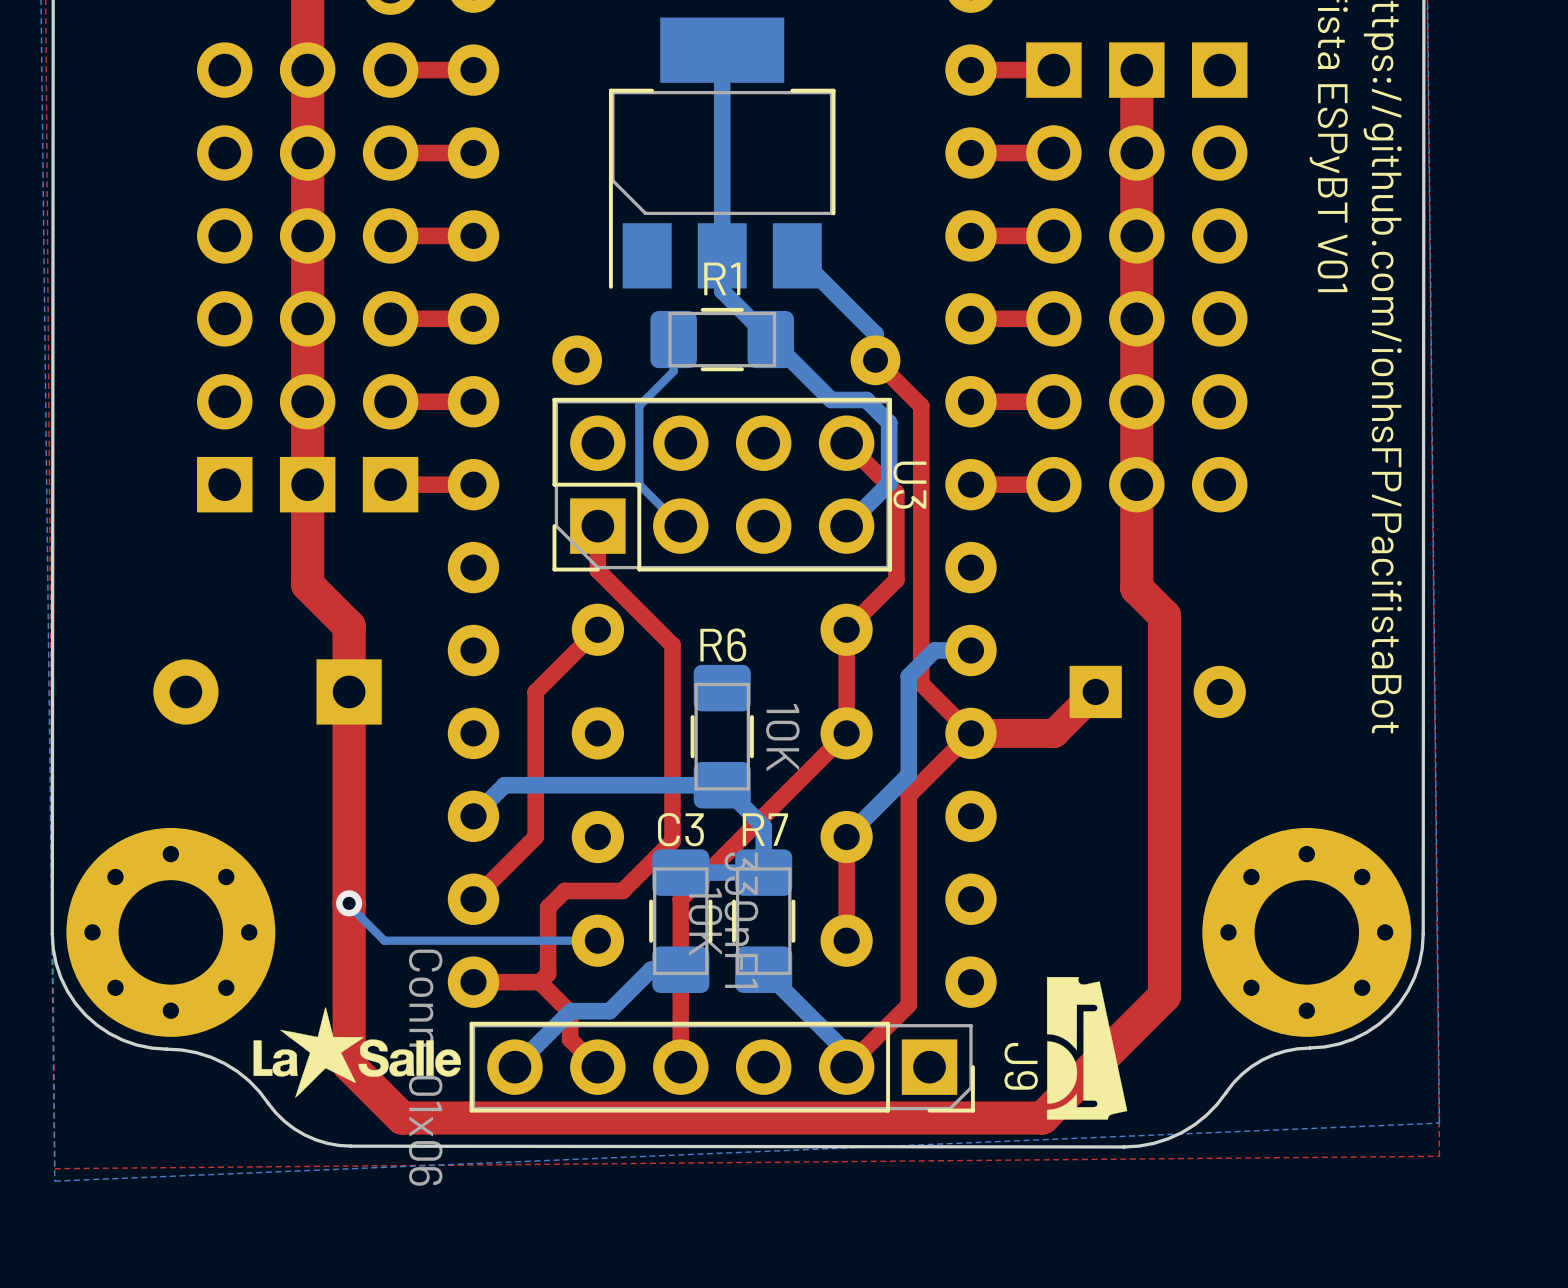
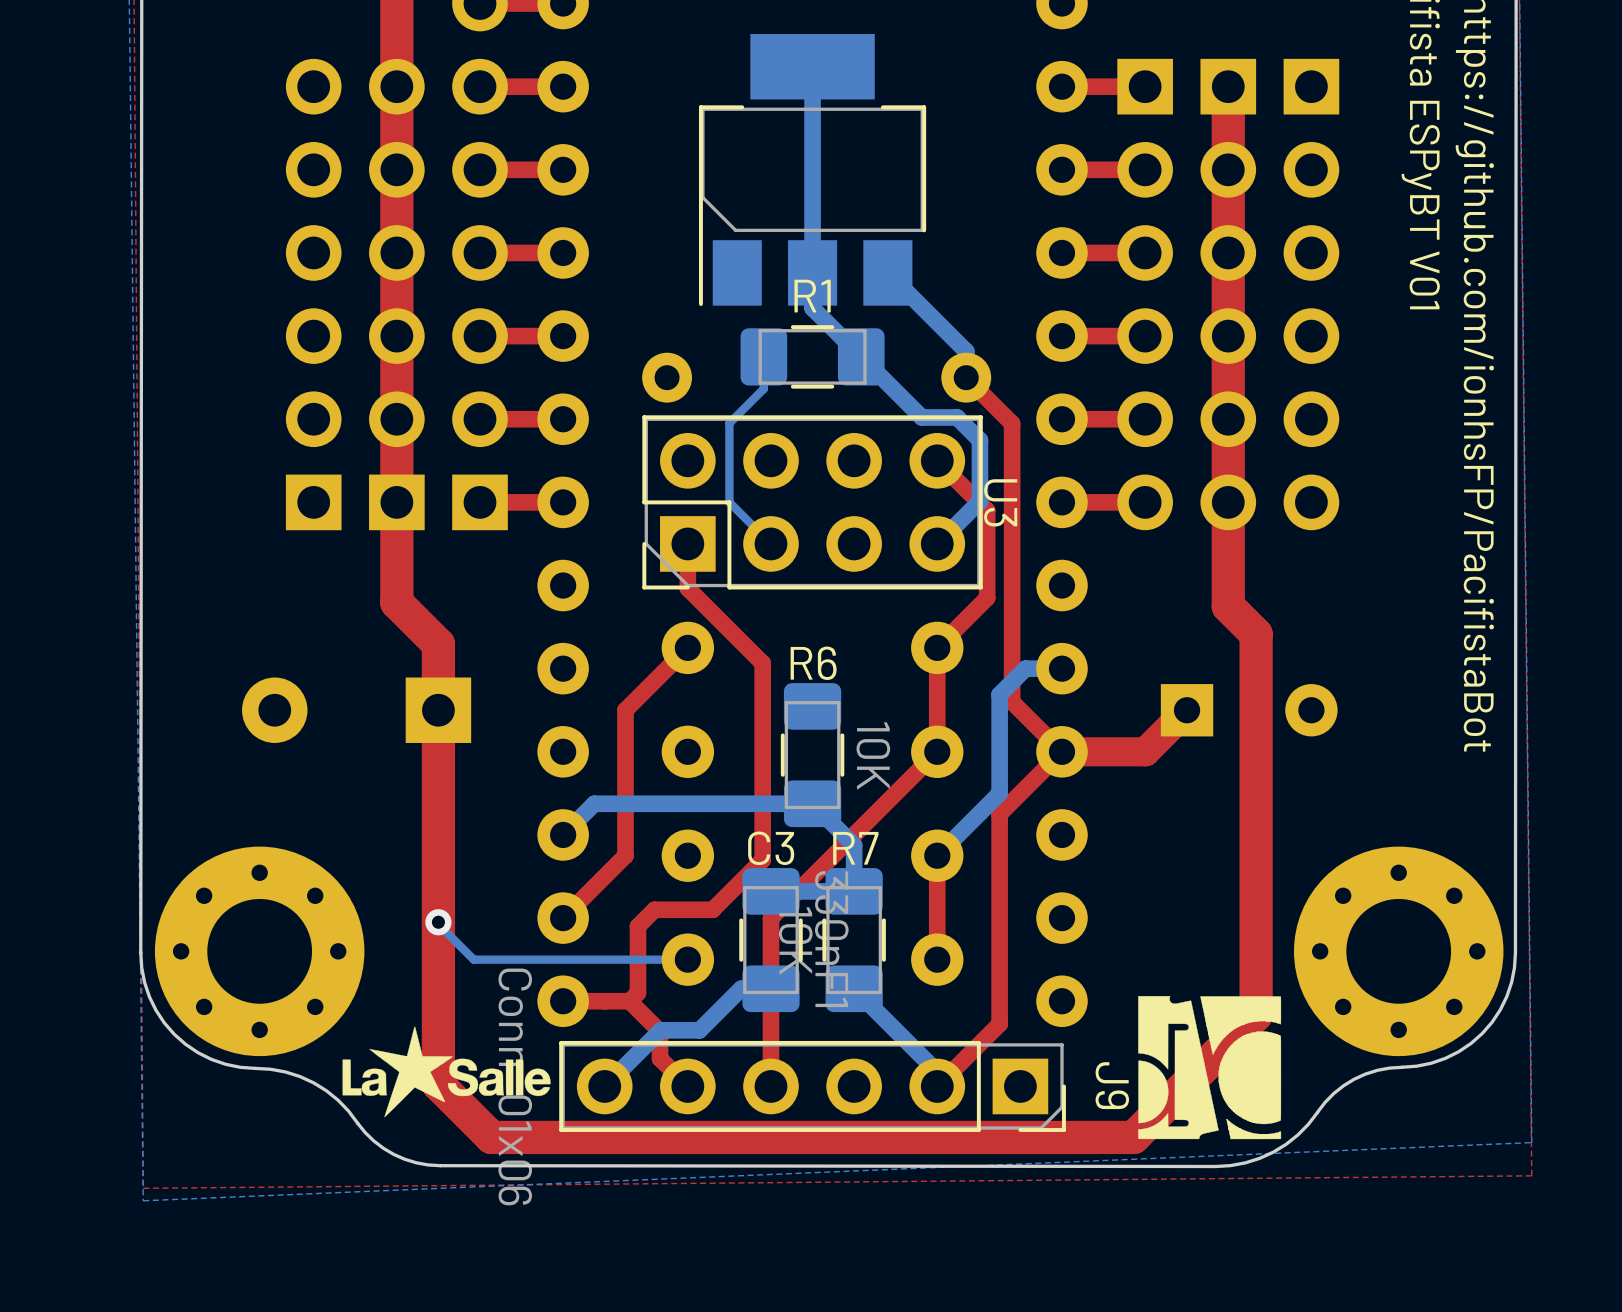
drawing shape: [1046, 976, 1140, 1120] -> [1138, 996, 1282, 1140]

